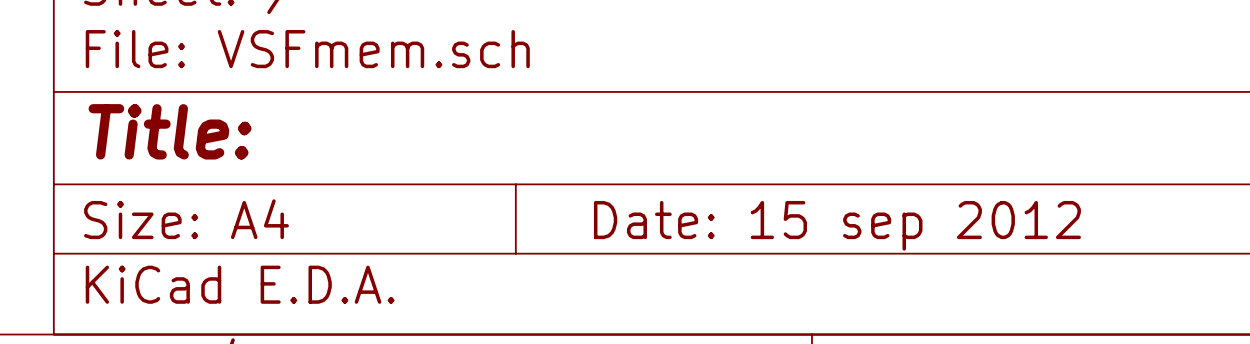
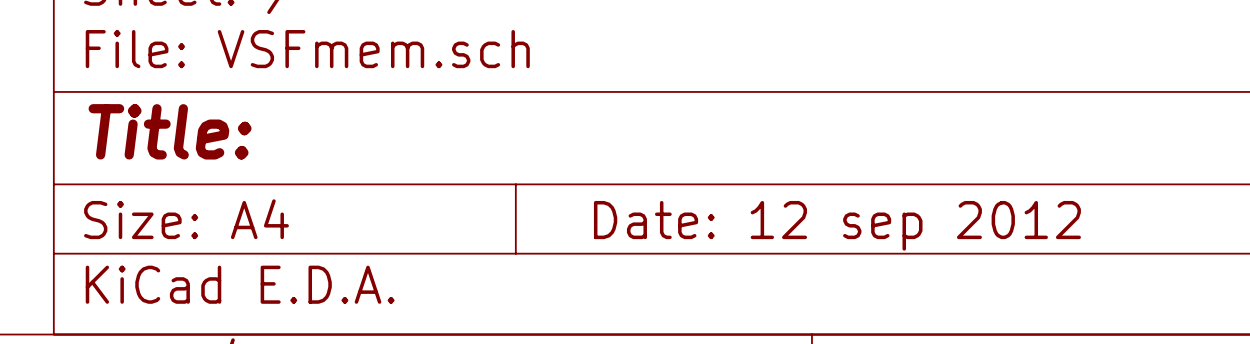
title block: Date: 15 sep 2012 (837, 225) -> Date: 12 sep 2012 (837, 225)

